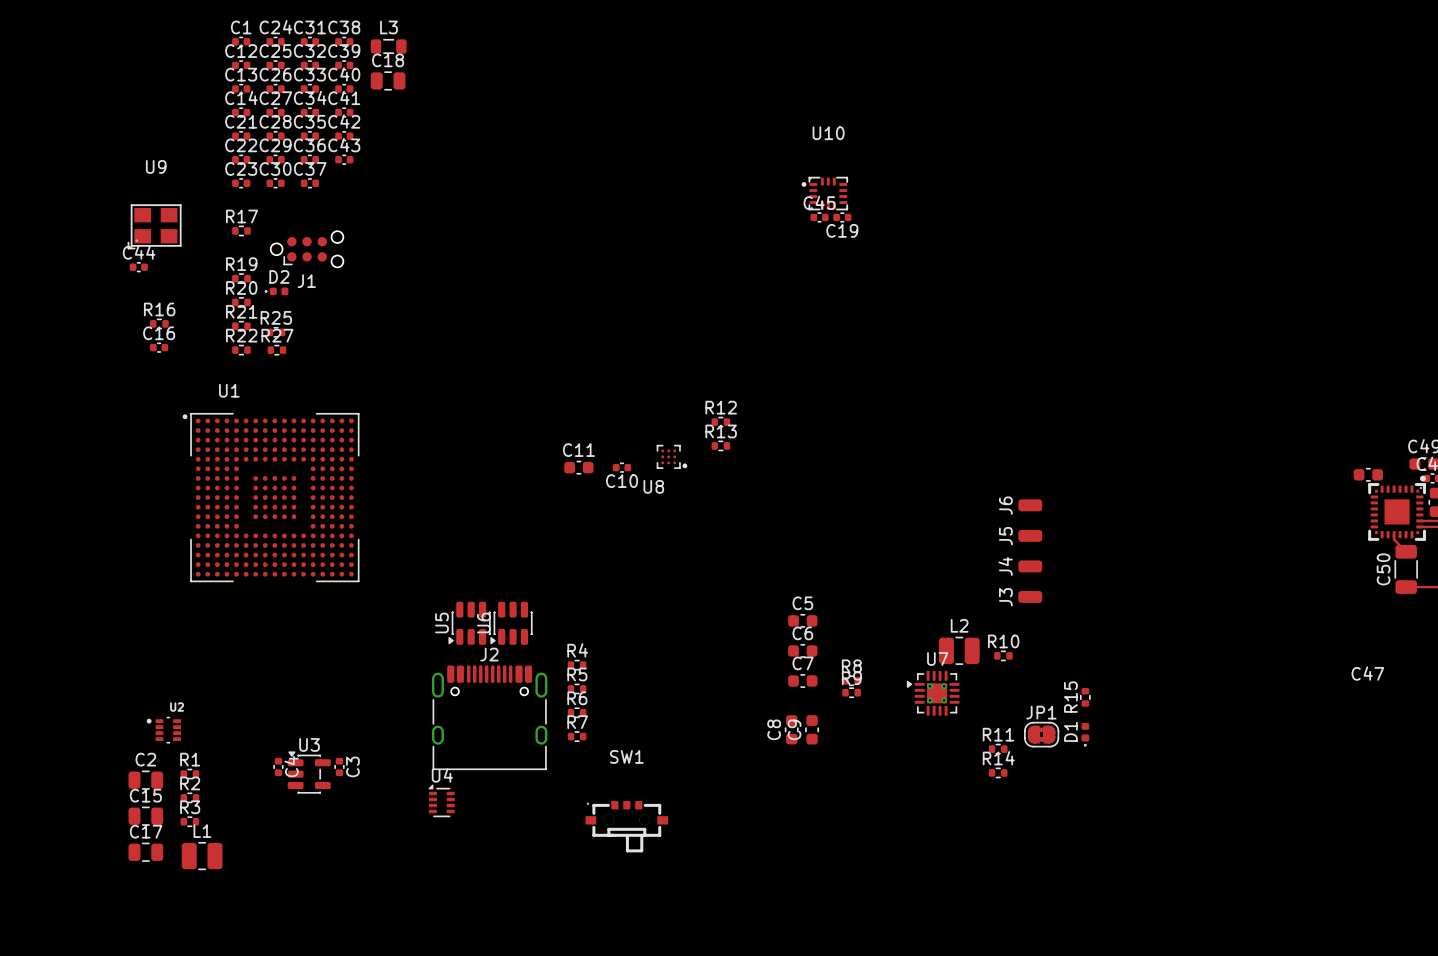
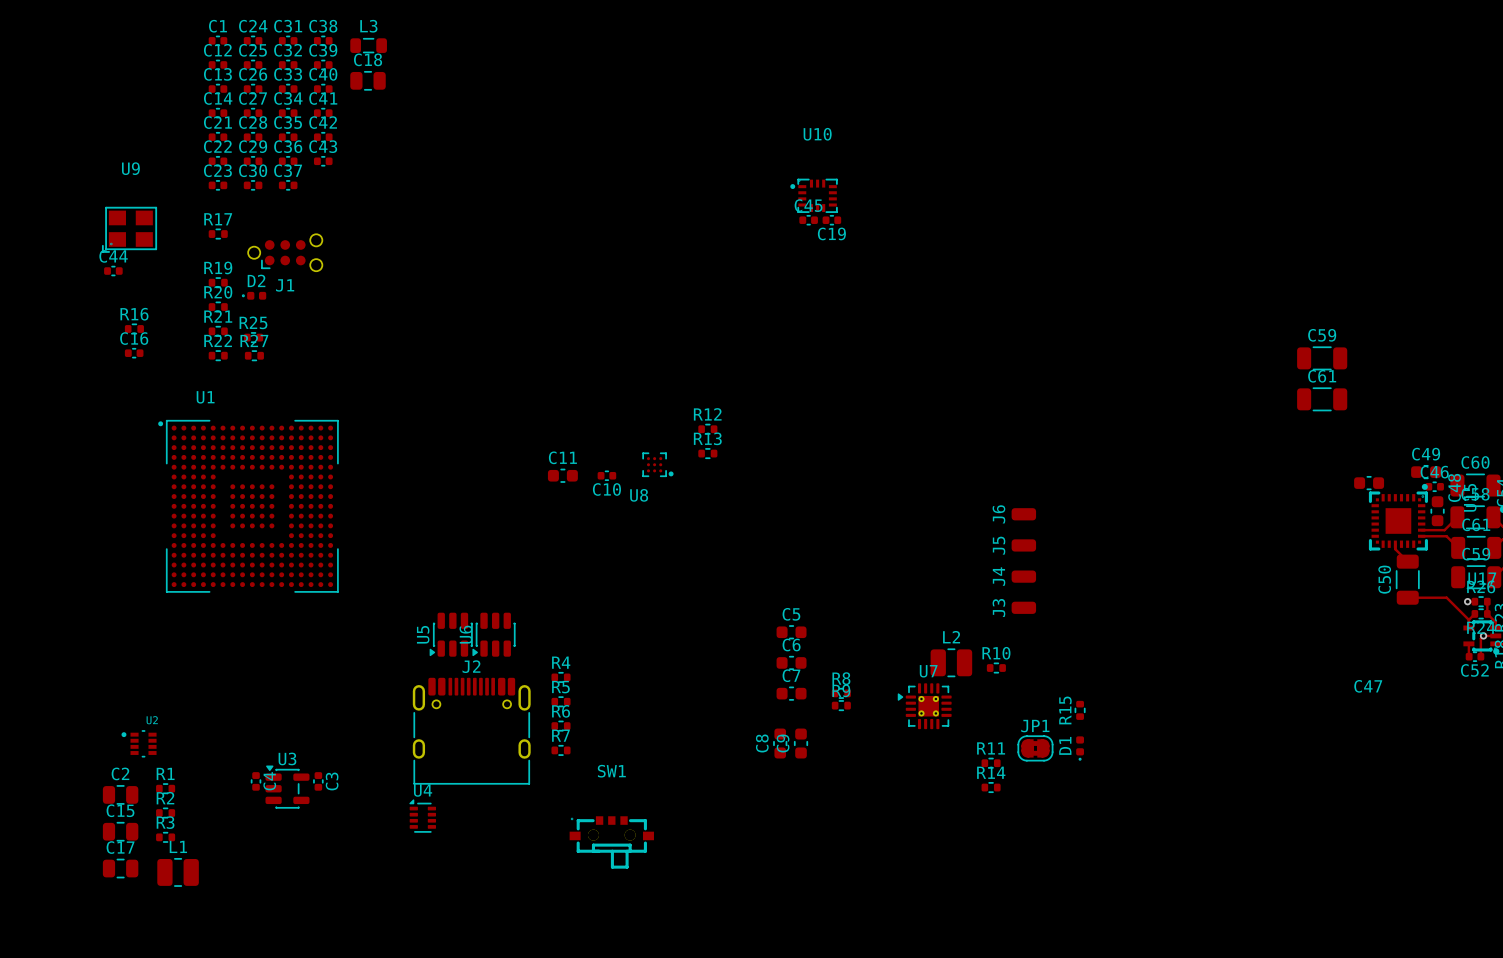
C59: none -> (1322, 358)
C61: none -> (1322, 399)

